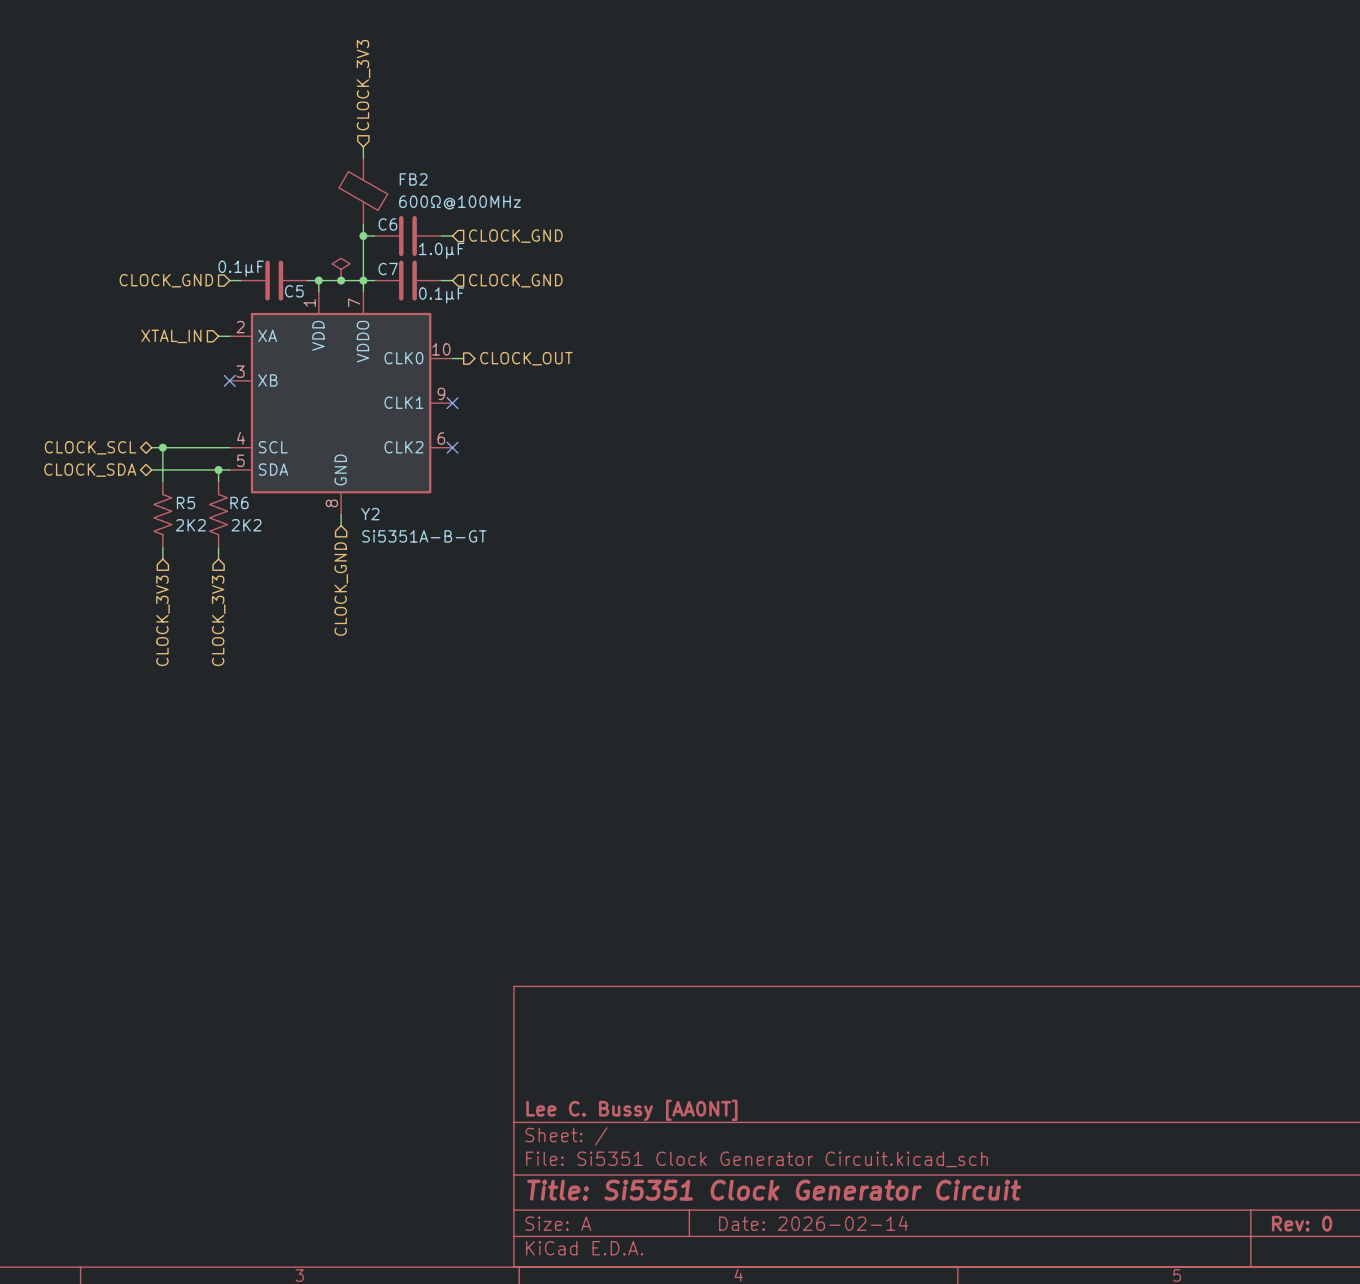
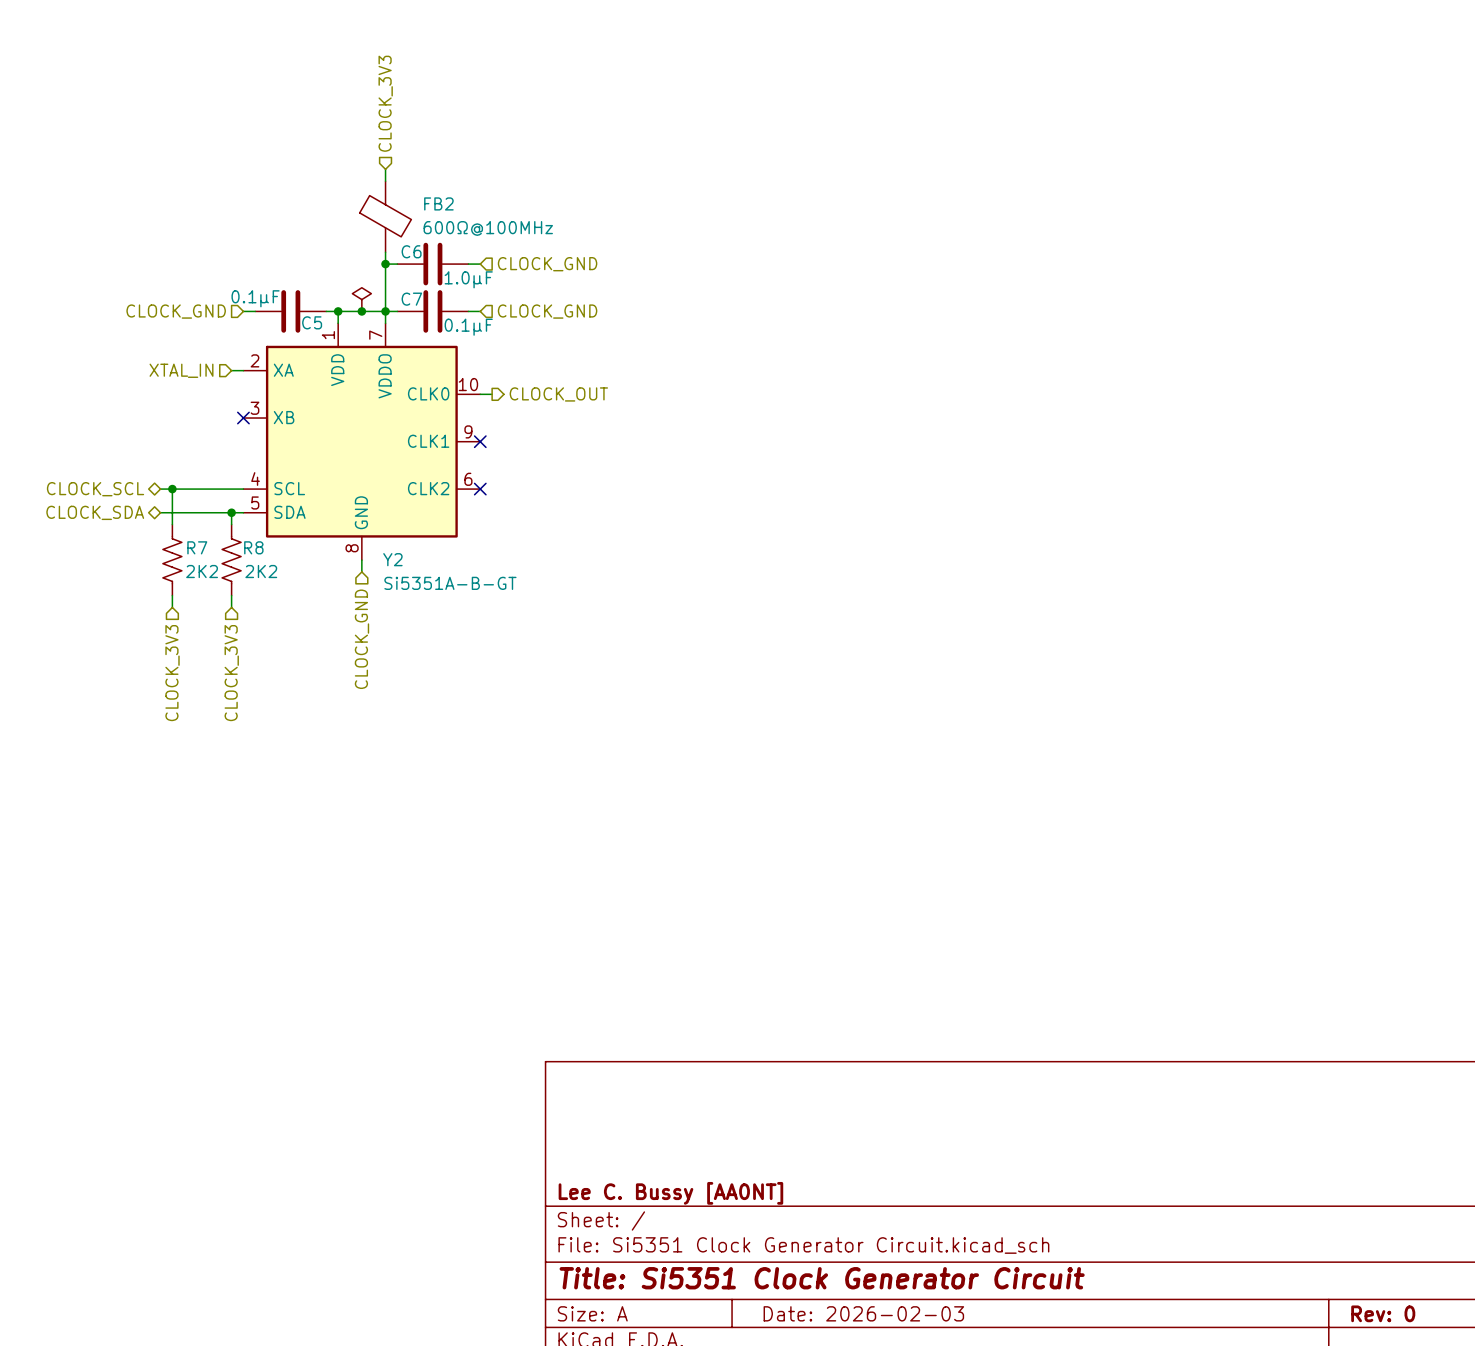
R5 name: R5 (186, 502) -> R7 (197, 547)
R6 name: R6 (239, 502) -> R8 (253, 547)
title block: Date: 2026-02-14 (813, 1223) -> Date: 2026-02-03 (863, 1313)

